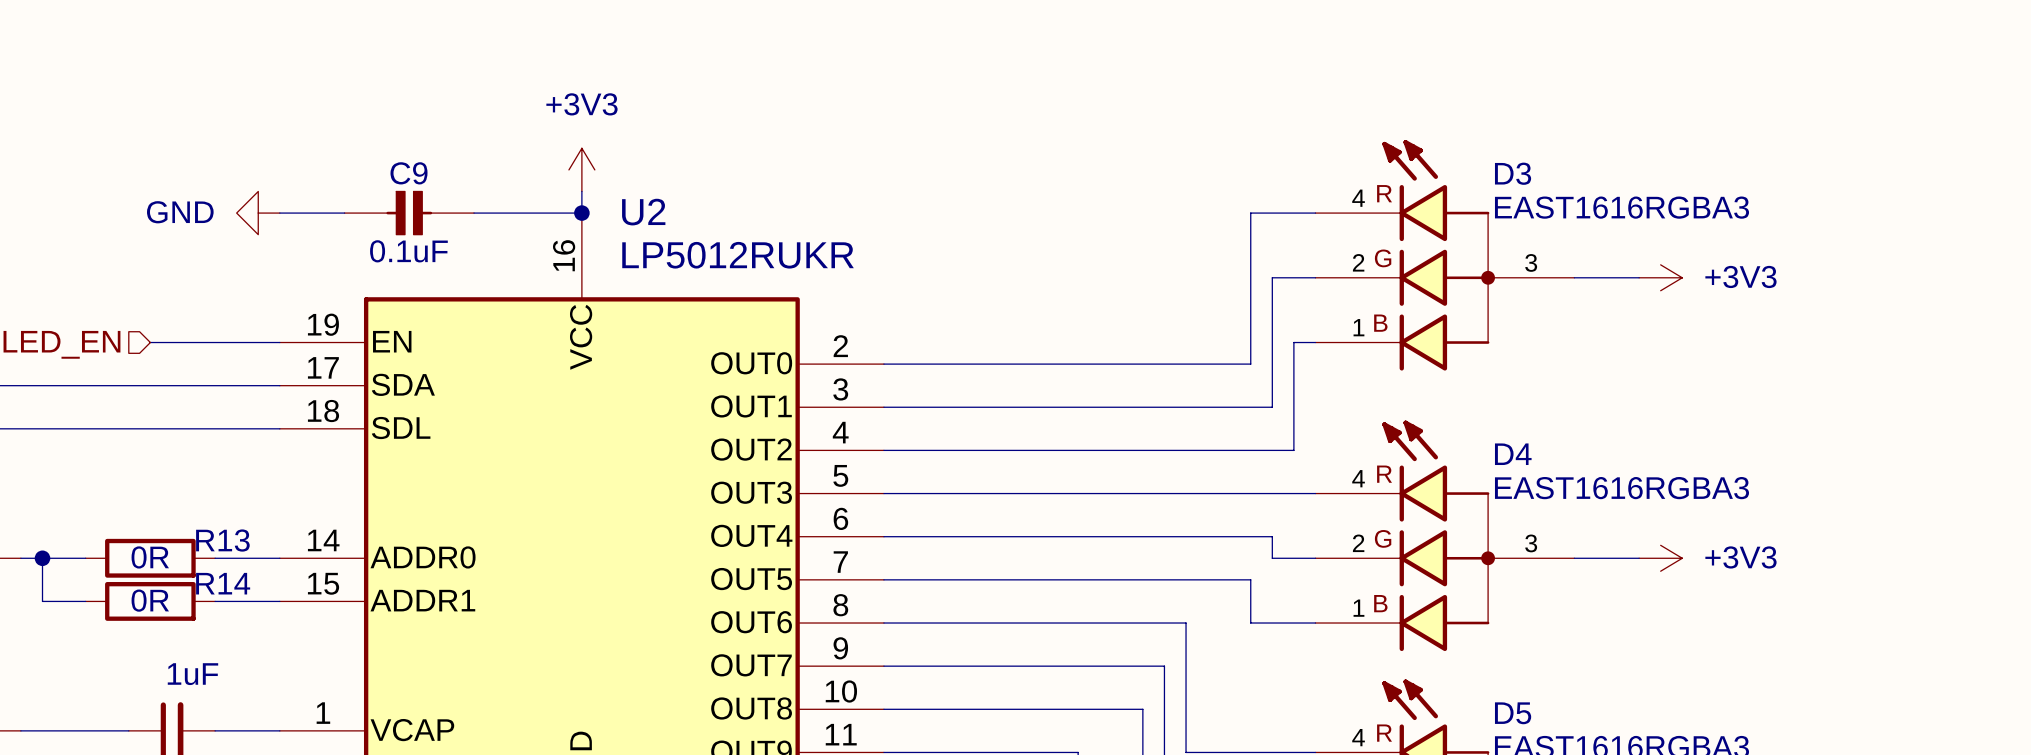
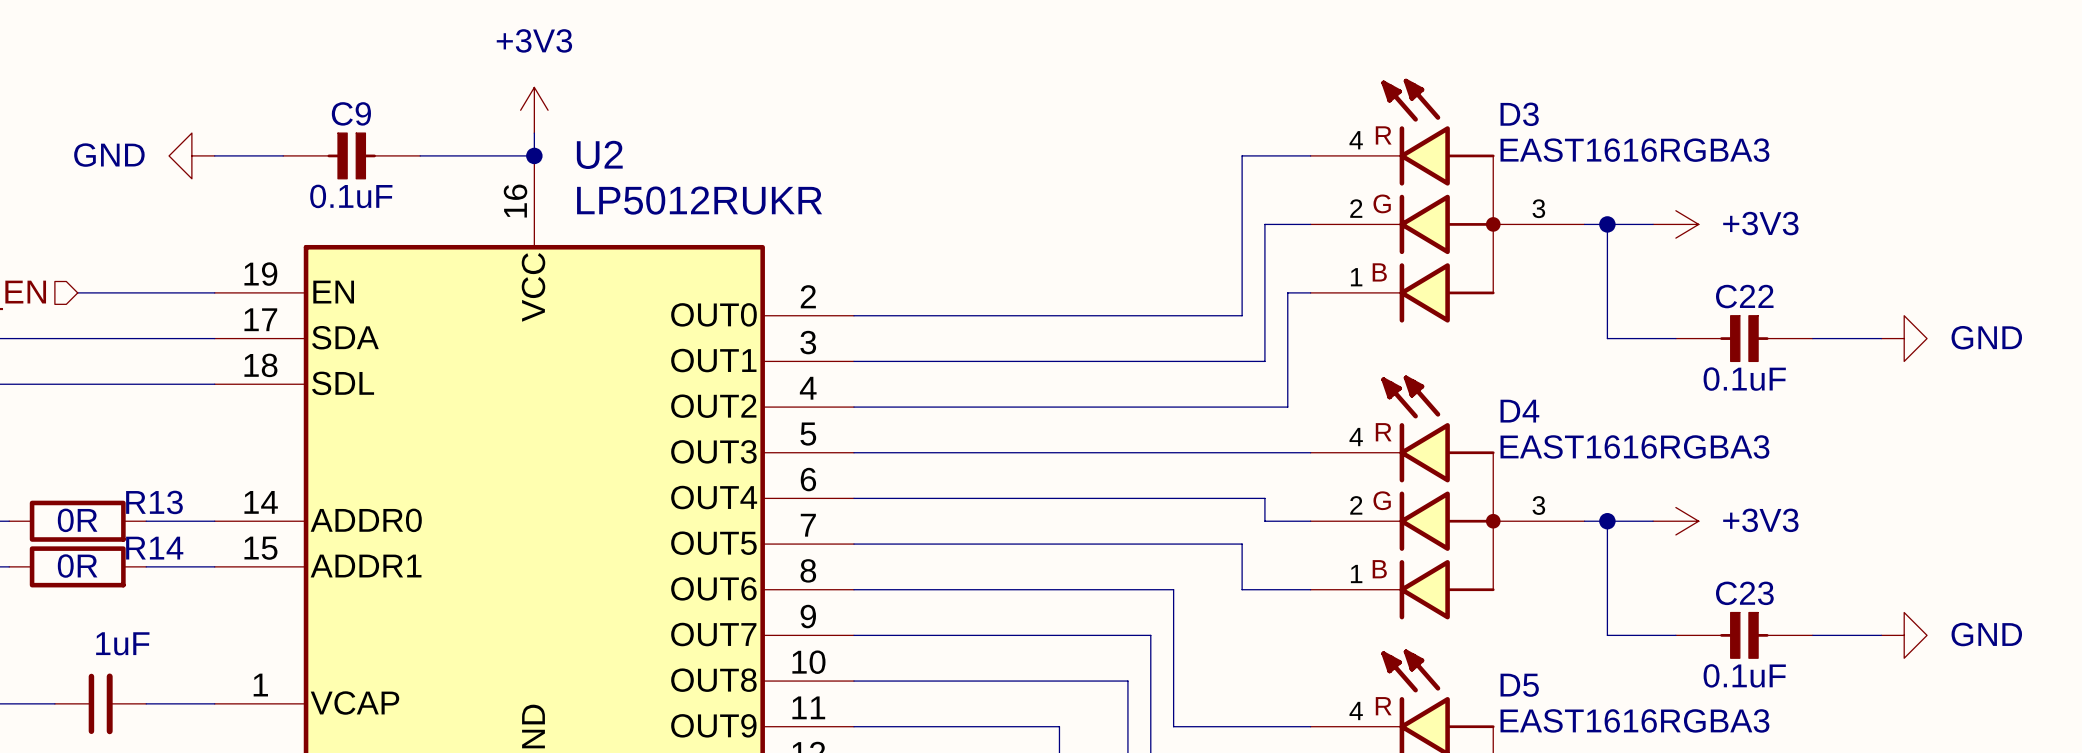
wire: none -> (1607, 224) (1607, 338) (1675, 338)
junction: none -> (1607, 224)
C22: none -> 0.1uF (1744, 338)
wire: none -> (1812, 338) (1881, 338)
power symbol: none -> GND (1904, 338)
wire: none -> (1607, 521) (1607, 635) (1675, 635)
junction: none -> (1607, 521)
C23: none -> 0.1uF (1744, 635)
wire: none -> (1812, 635) (1881, 635)
power symbol: none -> GND (1904, 635)

